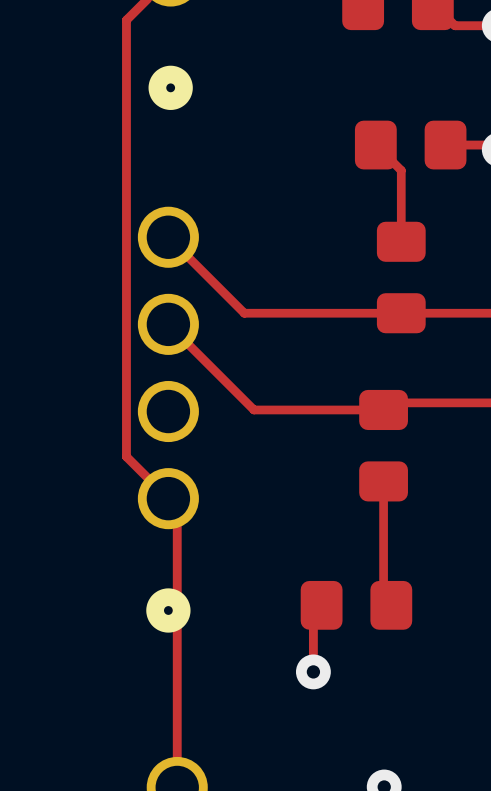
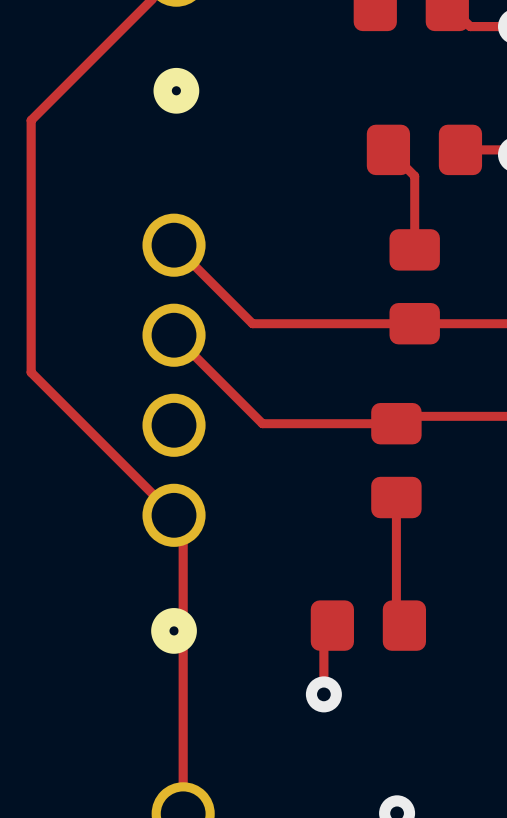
top track: (126, 20) (126, 456) -> (130, 20) (31, 120) (31, 372) (130, 471)

